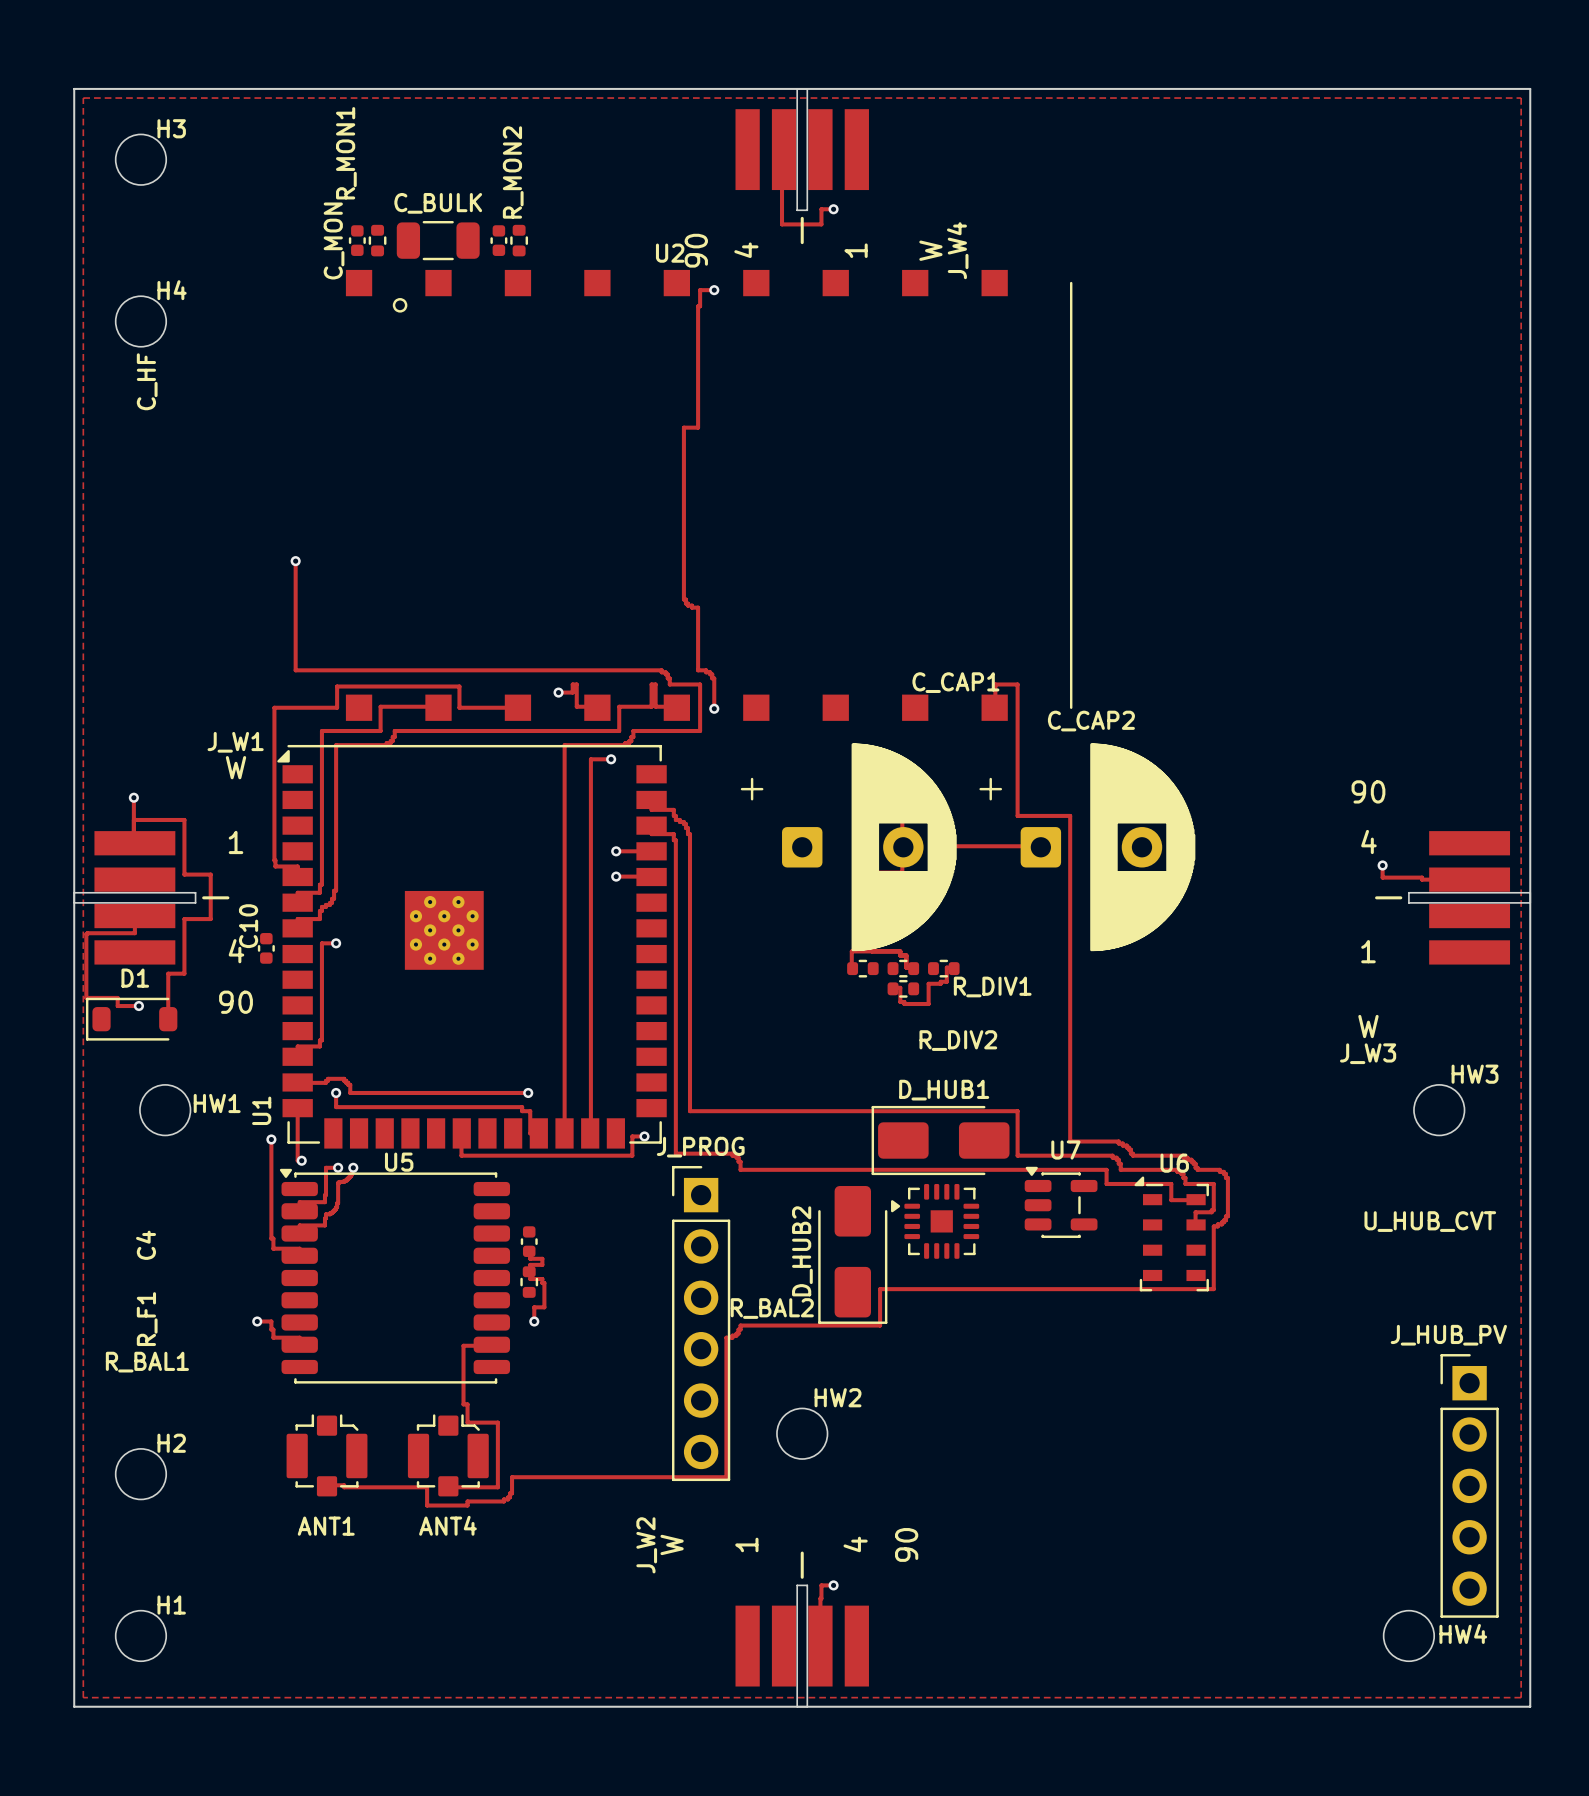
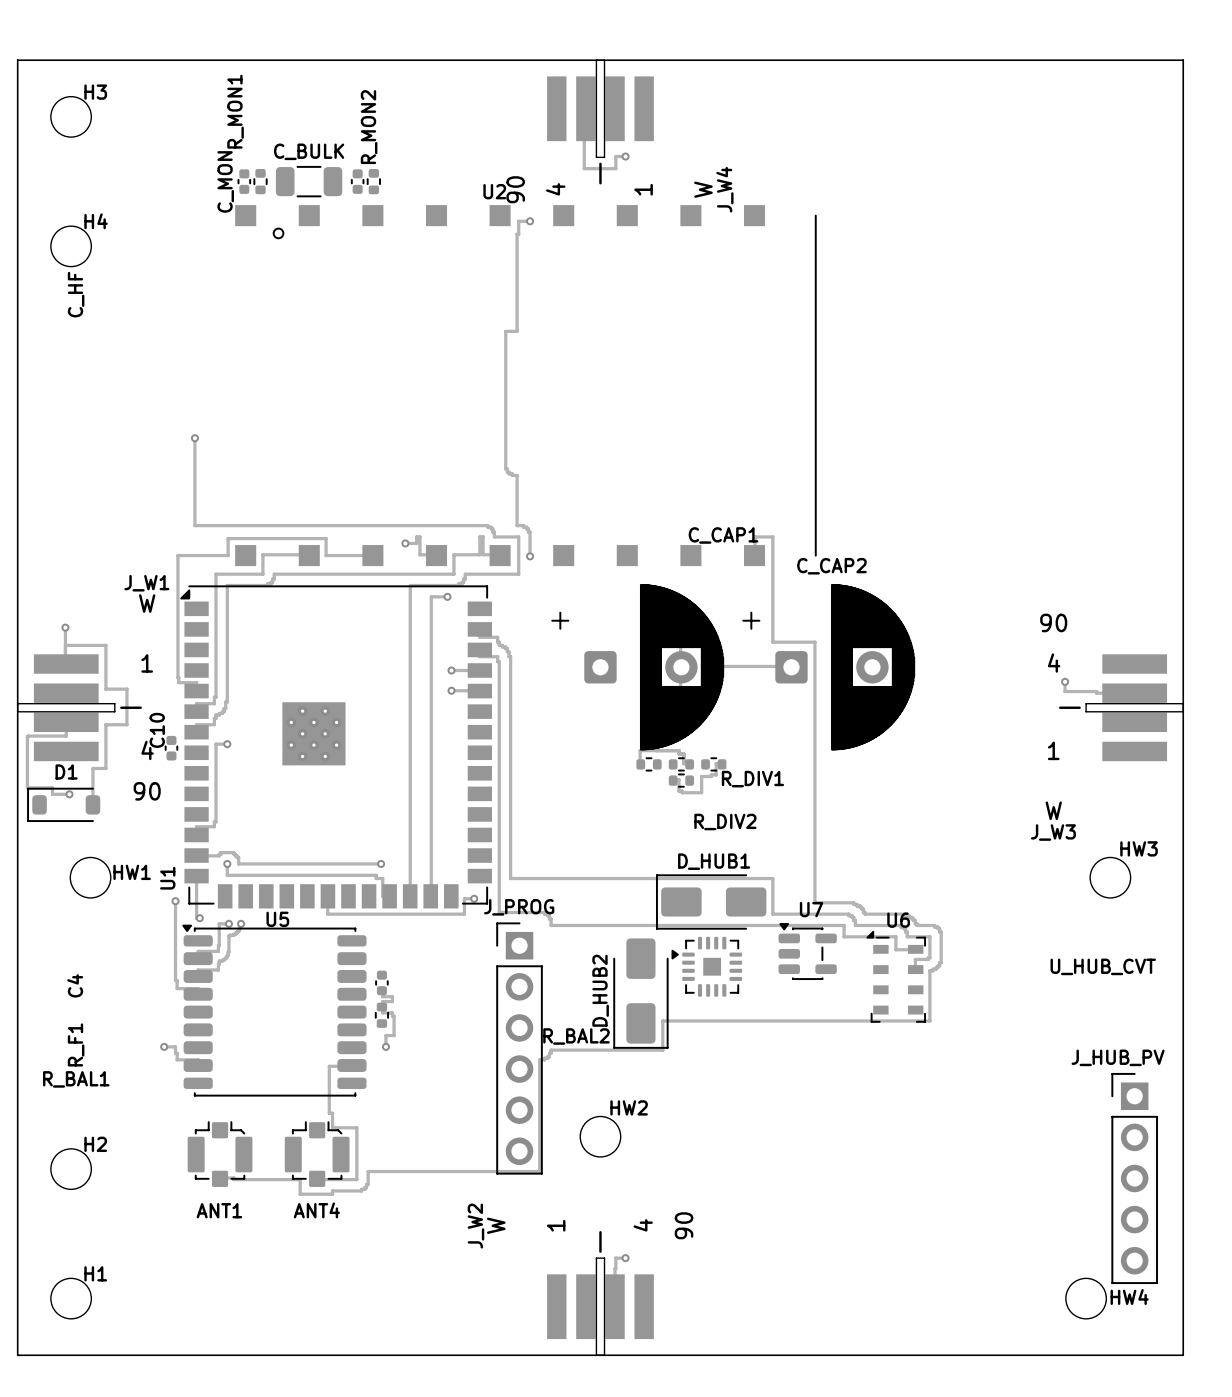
zone outline: (83, 98) (1521, 98) (1521, 1697) (83, 1697) (83, 98) -> none

